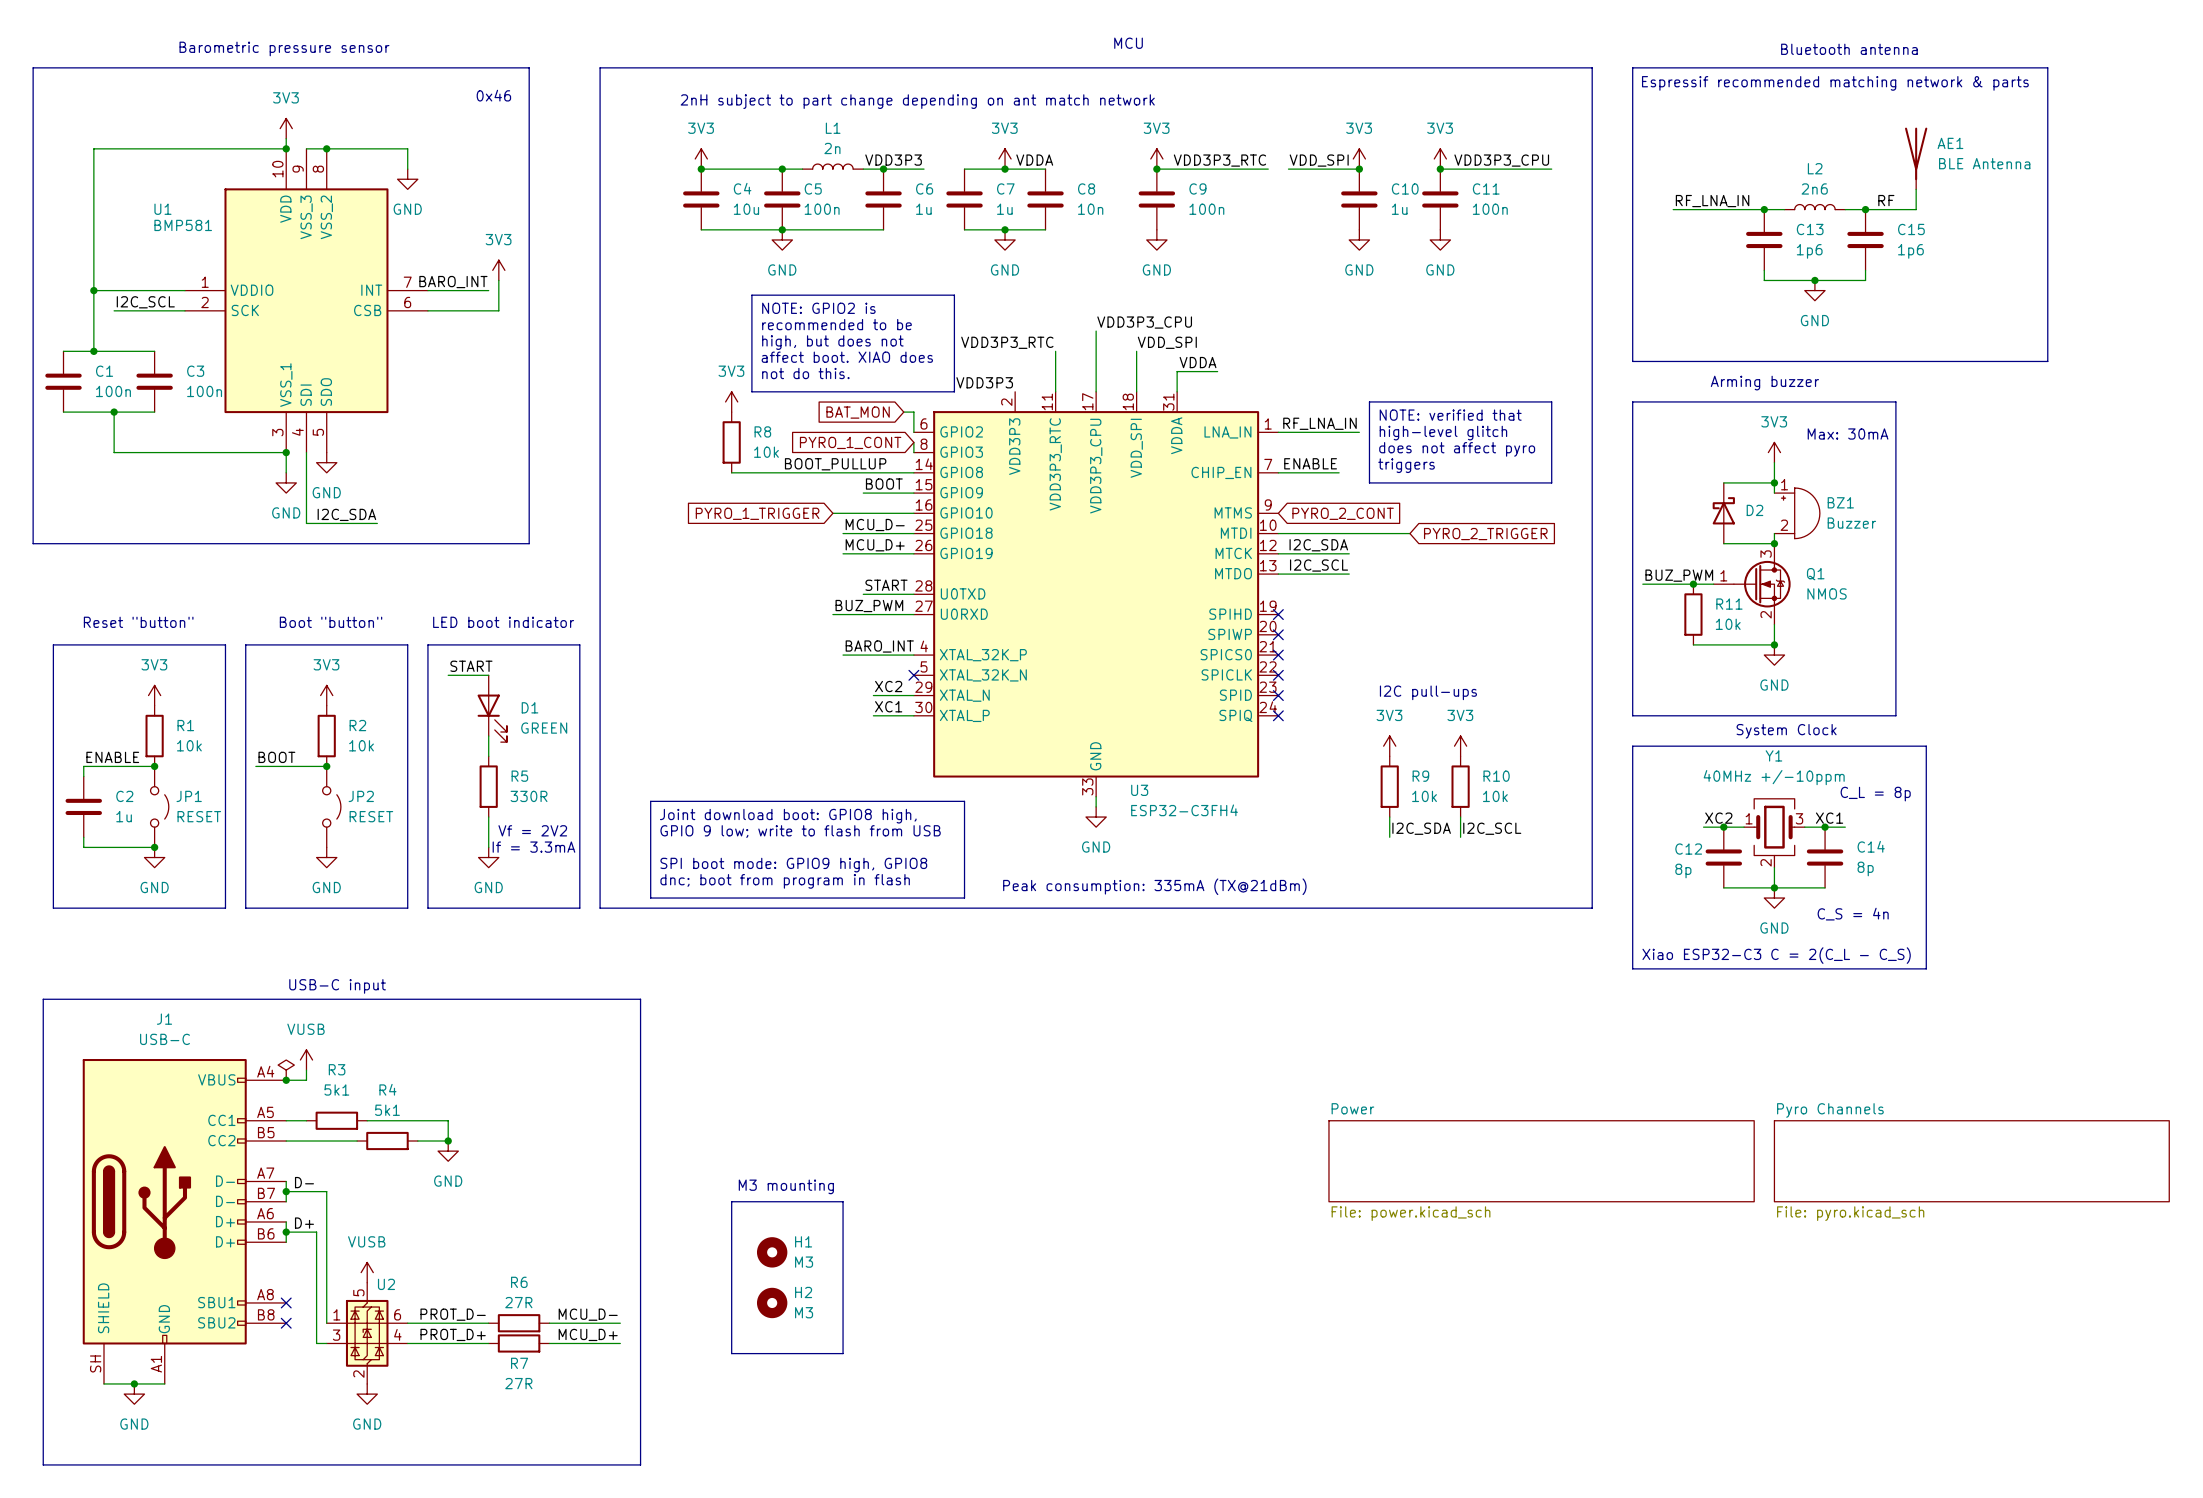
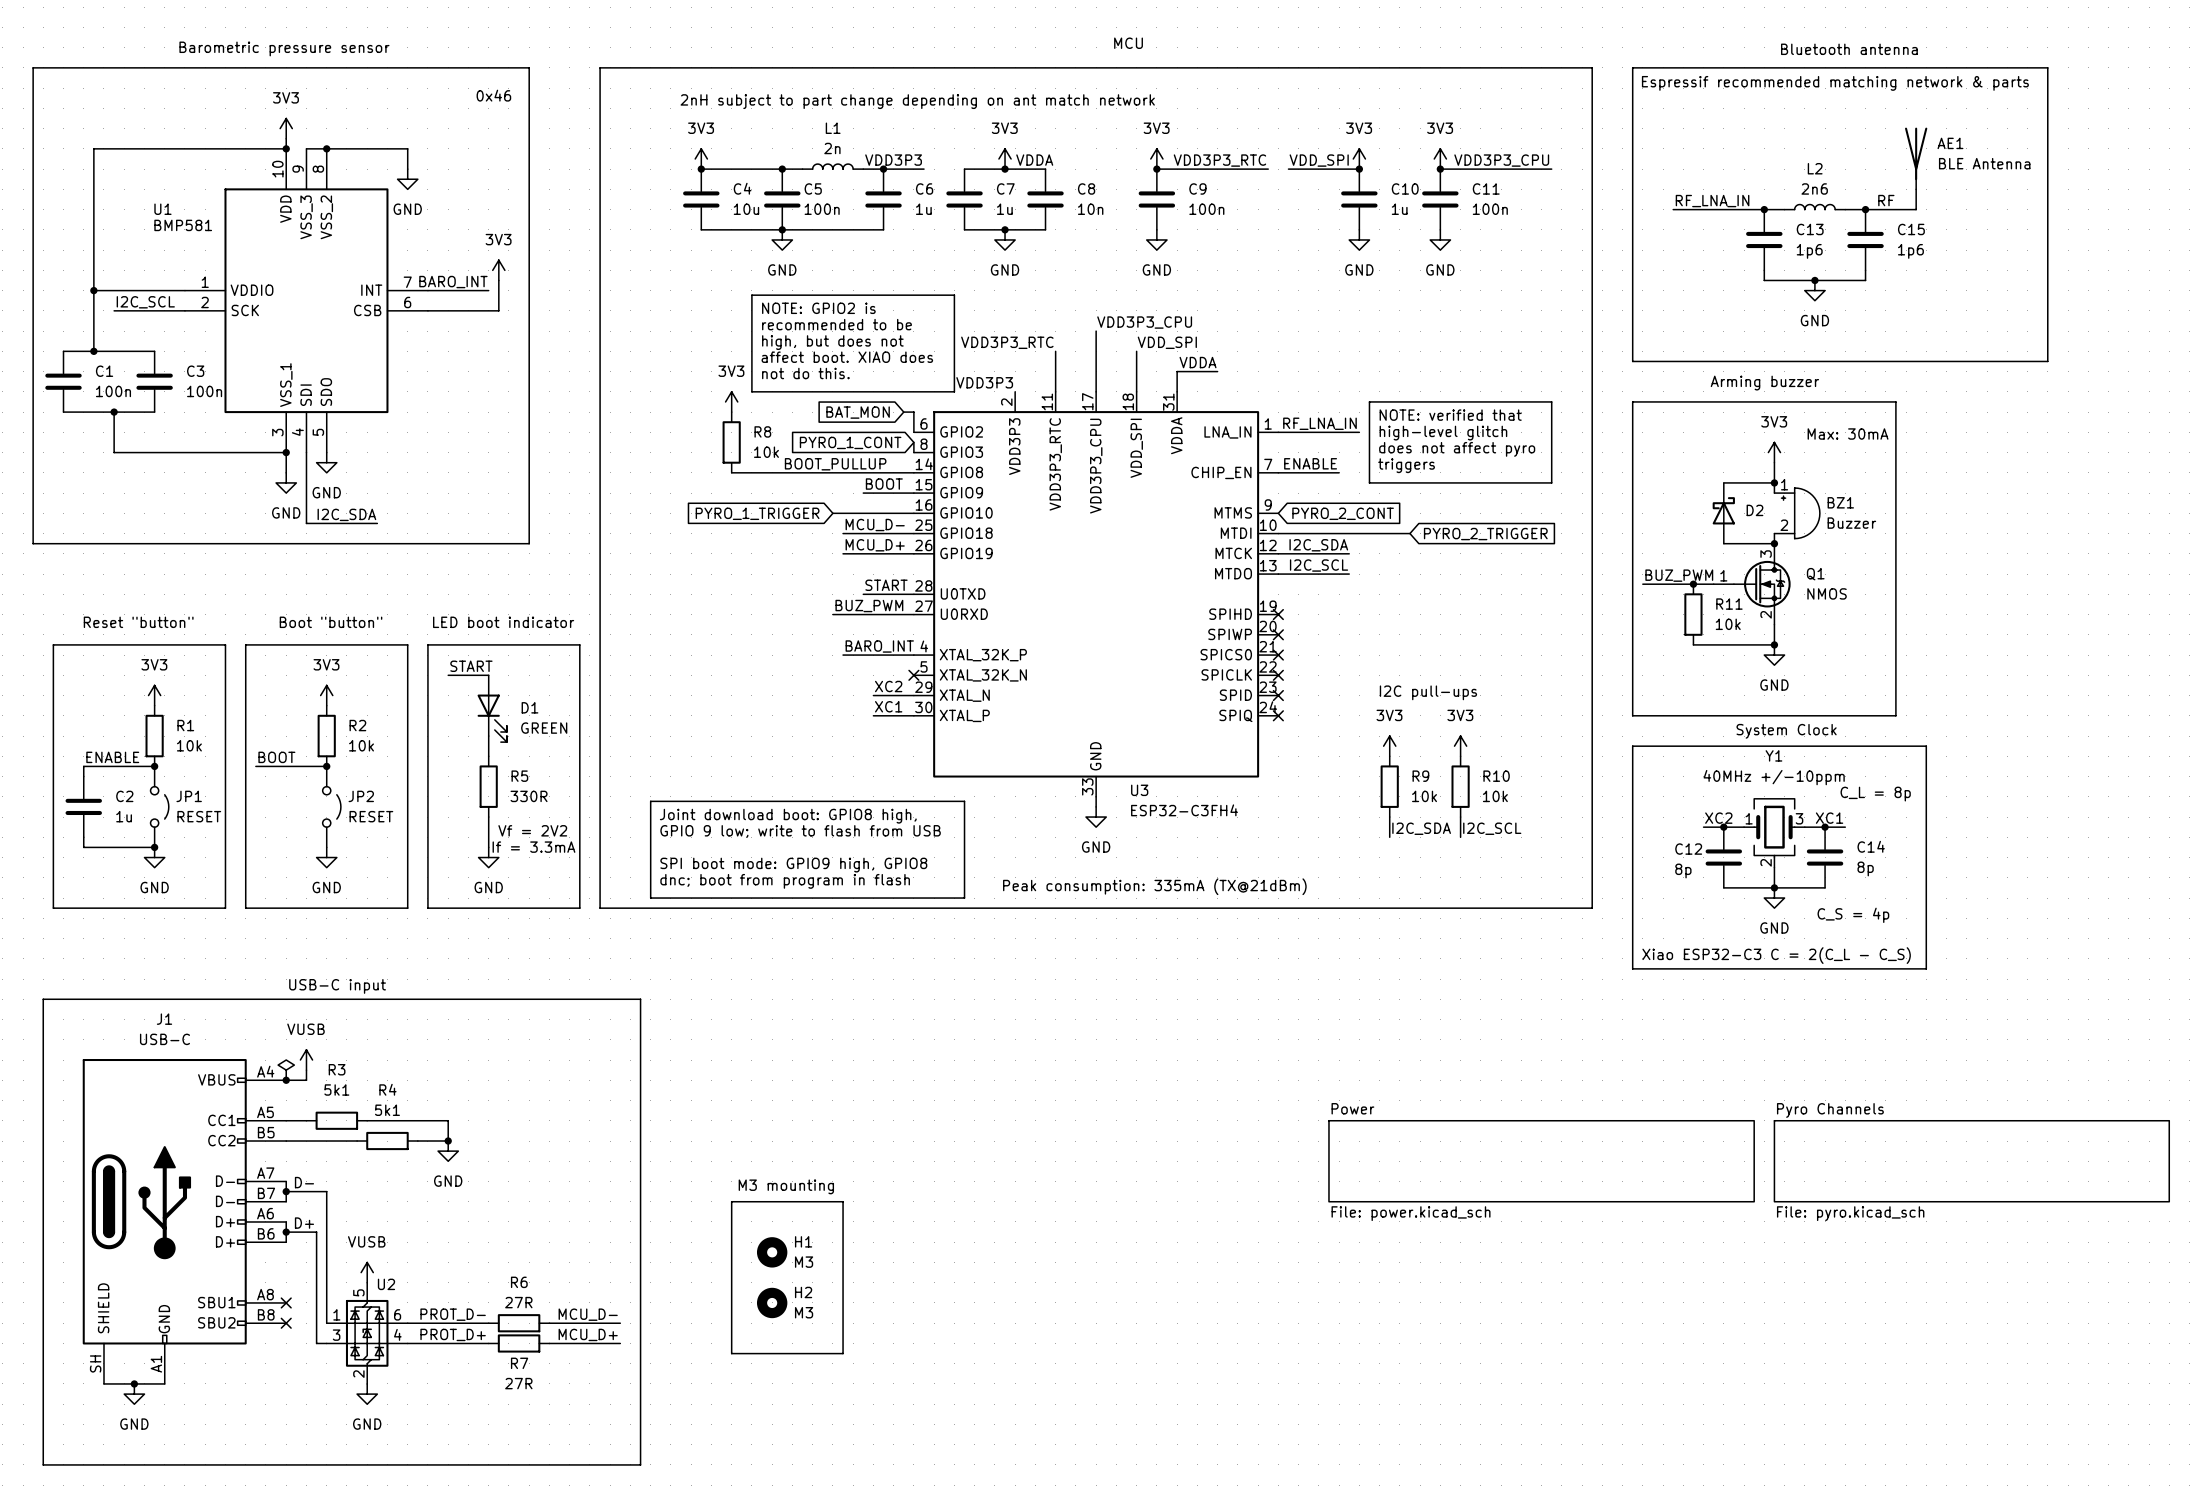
text: C_S = 4n (1853, 914) -> C_S = 4p (1853, 915)

